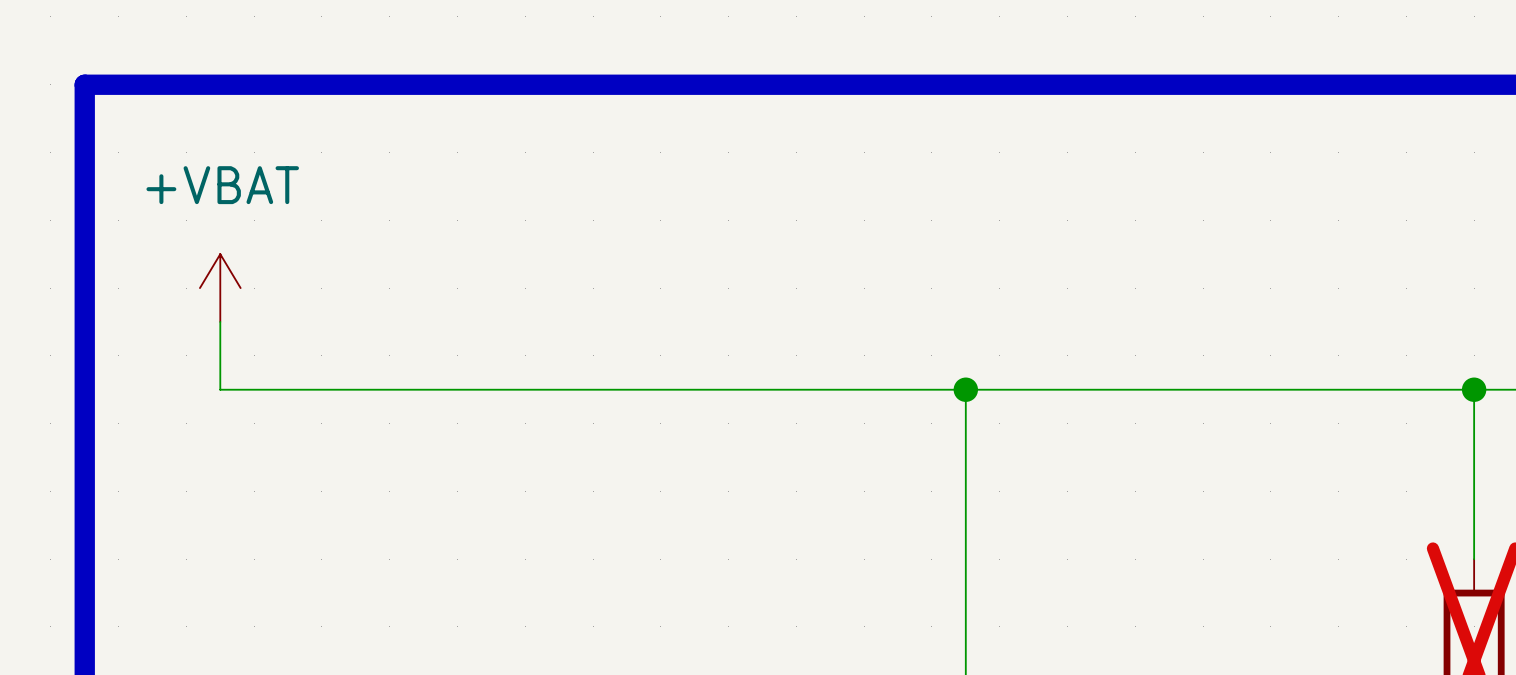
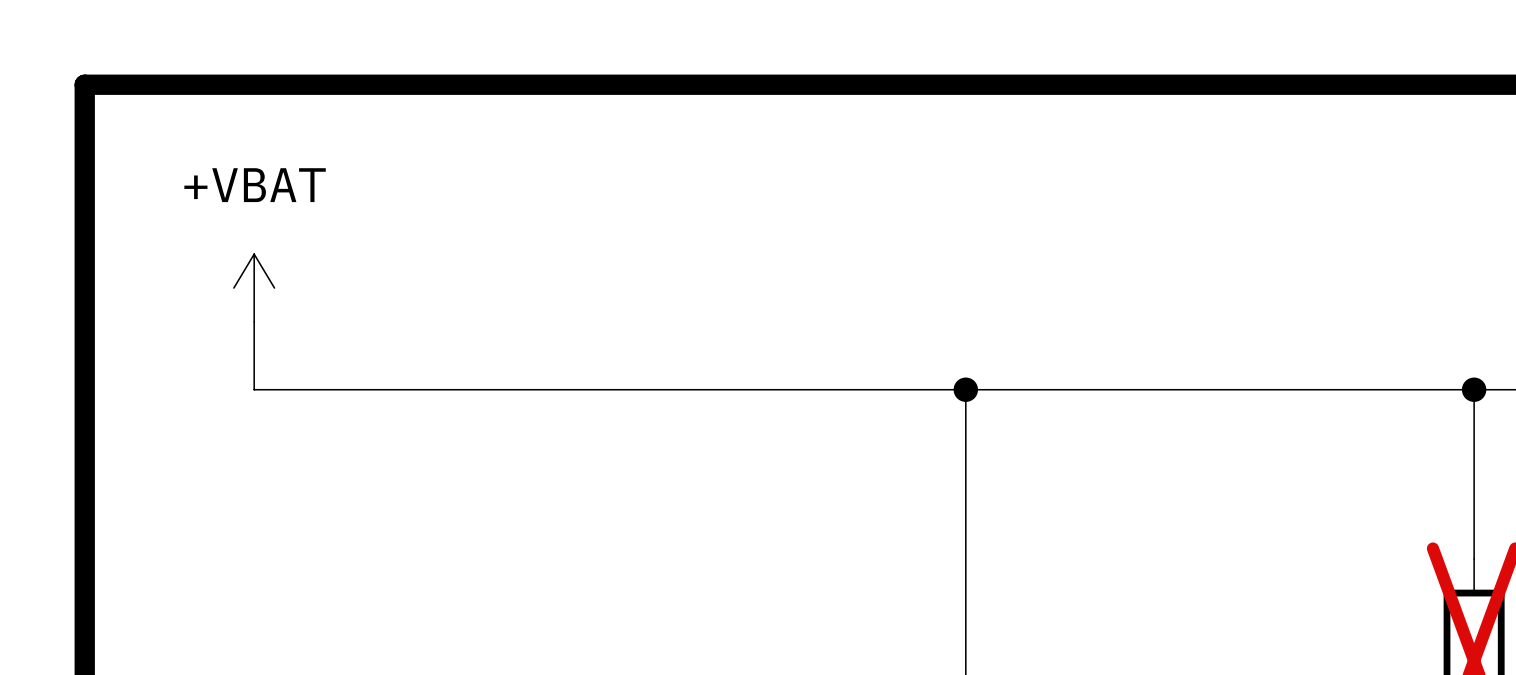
power symbol position: +VBAT (220, 288) -> +VBAT (254, 288)
wire: (220, 321) (220, 389) (254, 389) -> (254, 321) (254, 389)

